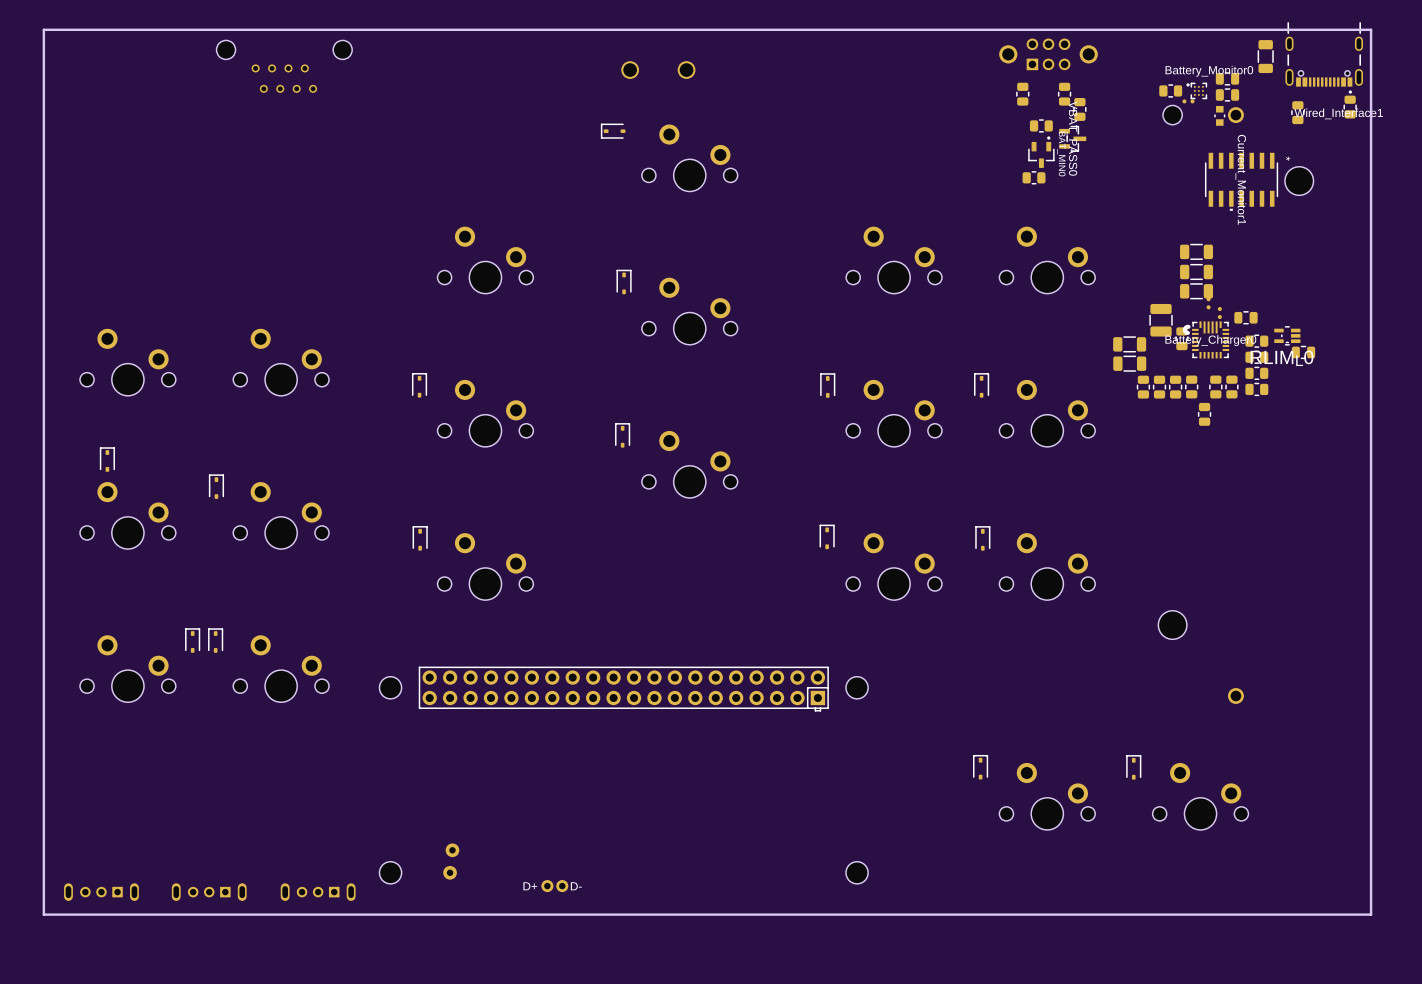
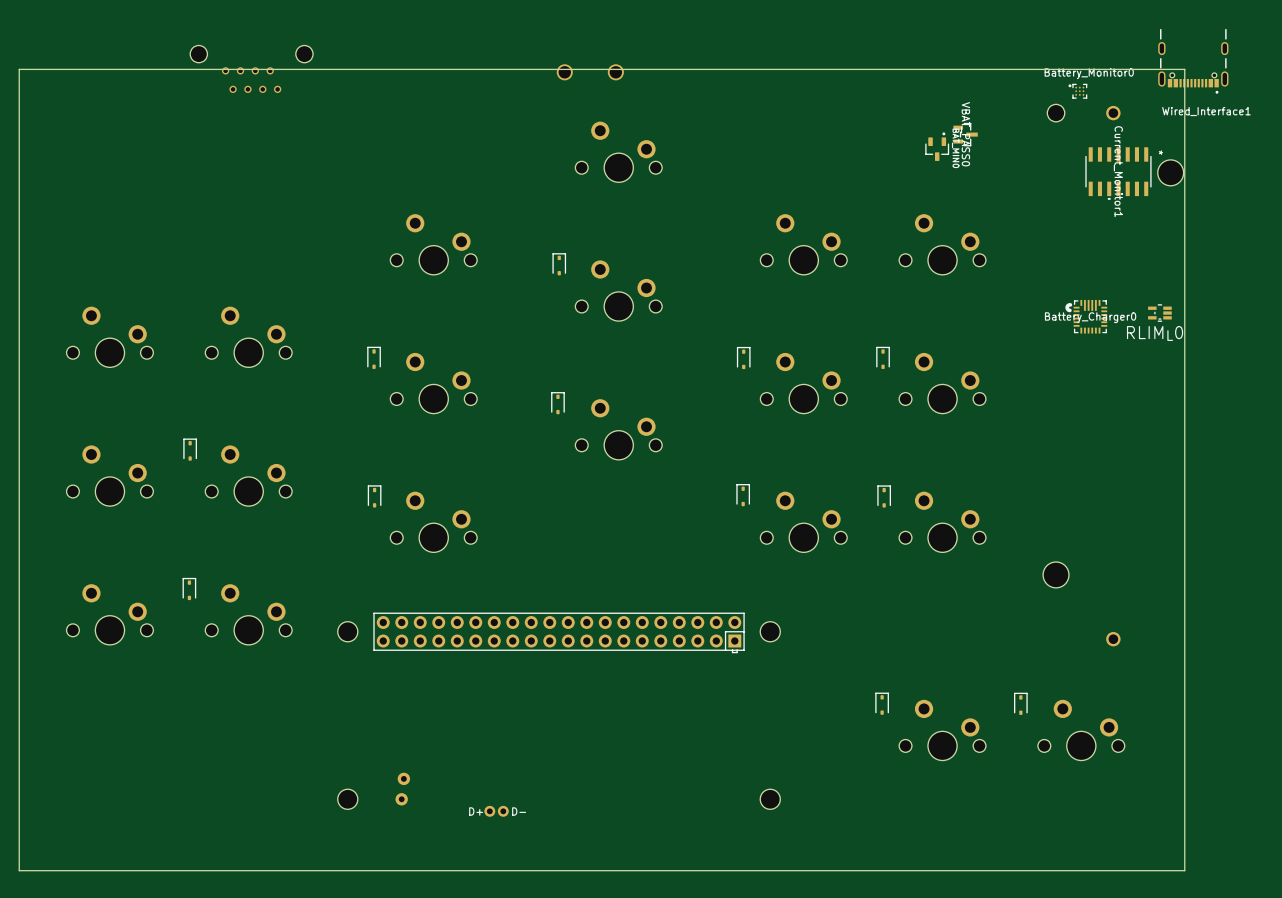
board edge: (1371, 29) (43, 29) (43, 914) (1371, 914) (1371, 29) -> (1184, 69) (1184, 870) (19, 870) (19, 69) (1184, 69)
part: (1048, 54) -> none
part: (1265, 56) -> none
part: (1227, 78) -> none
part: (1170, 90) -> none
part: (1022, 94) -> none
part: (1064, 94) -> none
part: (1227, 94) -> none
part: (1188, 101) -> none
part: (1350, 107) -> none
part: (1079, 109) -> none
part: (1297, 112) -> none
part: (1219, 115) -> none
part: (1041, 125) -> none
part: (613, 131) -> none
part: (1034, 177) -> none
part: (1196, 251) -> none
part: (1196, 271) -> none
part: (1196, 291) -> none
part: (1208, 303) -> none
part: (1219, 313) -> none
part: (1245, 317) -> none
part: (1161, 320) -> none
part: (1181, 338) -> none
part: (1256, 341) -> none
part: (1129, 344) -> none
part: (1303, 352) -> none
part: (1256, 357) -> none
part: (1129, 363) -> none
part: (1256, 373) -> none
part: (1143, 387) -> none
part: (1159, 387) -> none
part: (1175, 387) -> none
part: (1191, 387) -> none
part: (1215, 387) -> none
part: (1231, 387) -> none
part: (1256, 389) -> none
part: (1204, 414) -> none
part: (107, 459) -> none
part: (192, 640) -> none
part: (101, 892) -> none
part: (209, 892) -> none
part: (318, 892) -> none

